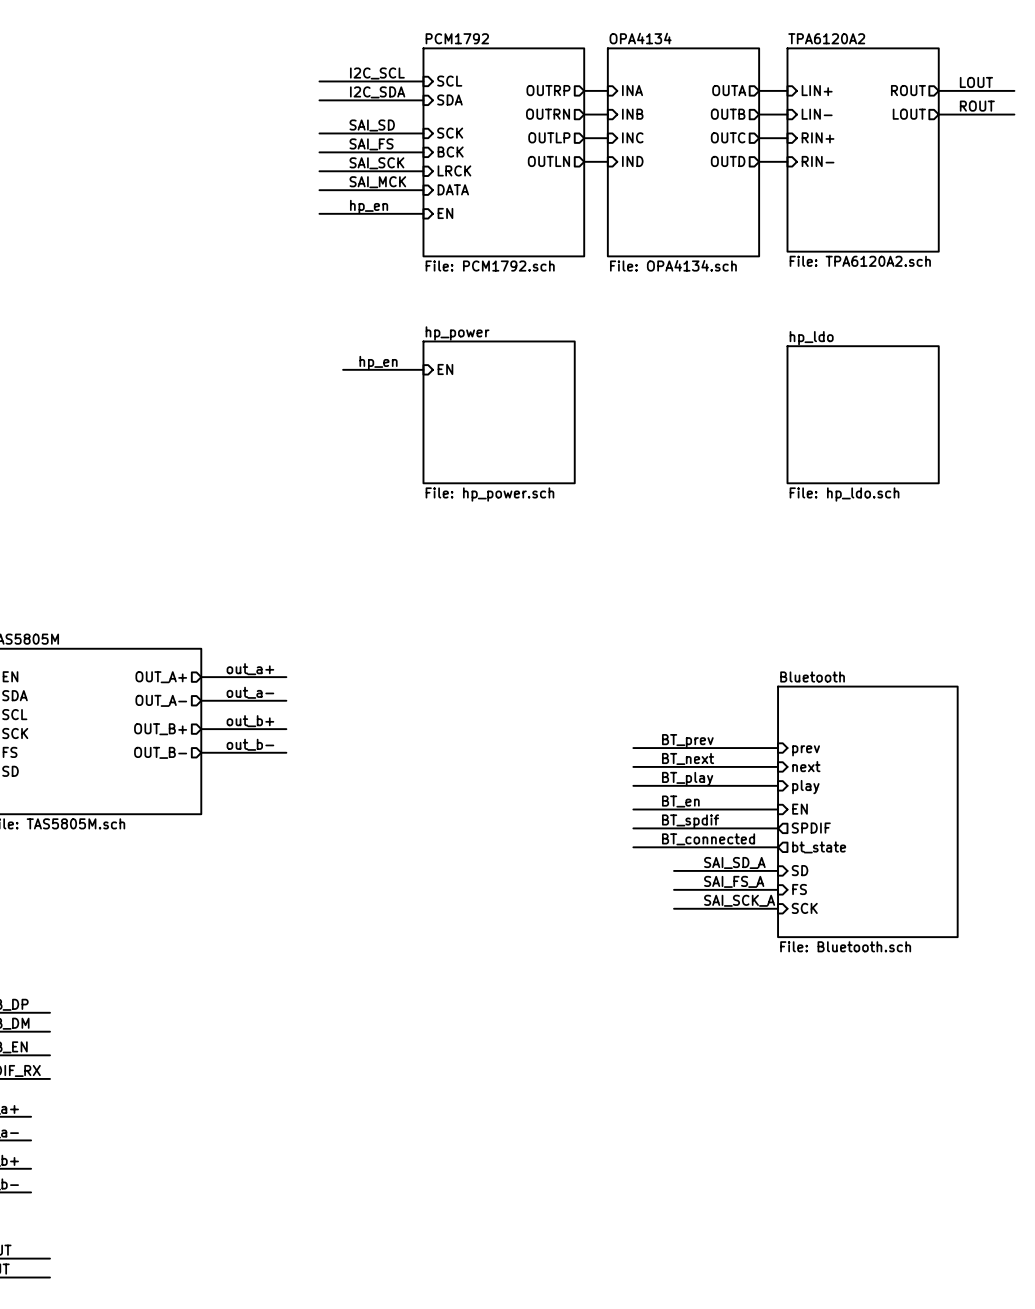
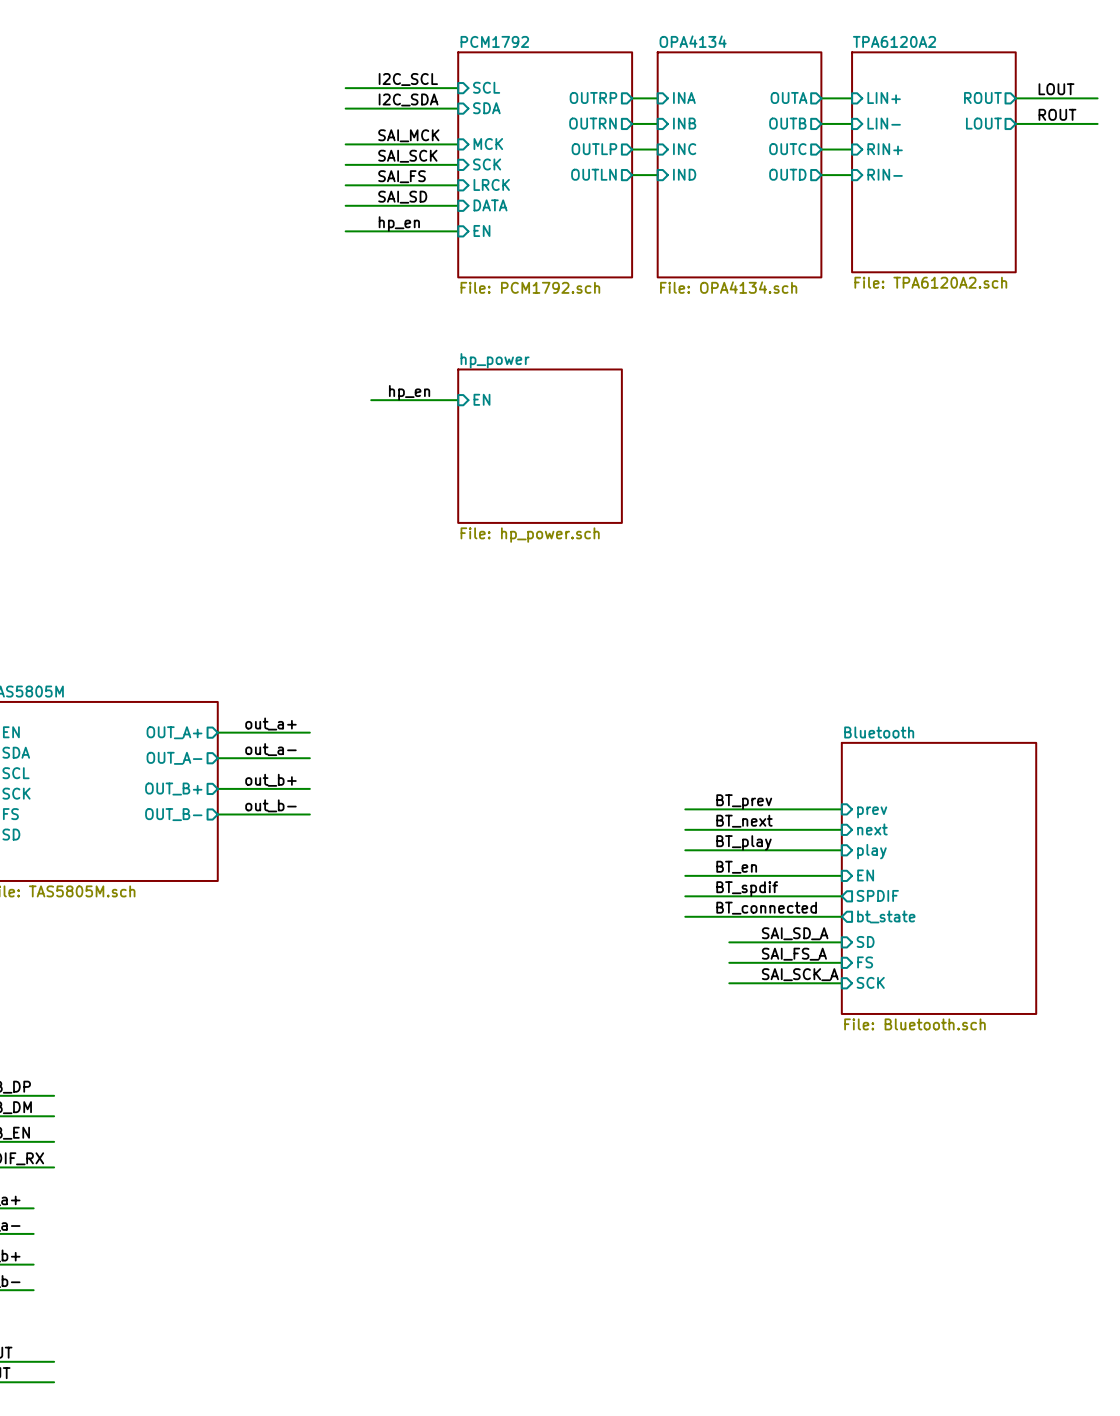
label: SAI_SD (372, 125) -> SAI_MCK (408, 135)
sheet pin: SCK (450, 133) -> MCK (488, 144)
label: SAI_FS (371, 144) -> SAI_SCK (407, 156)
sheet pin: BCK (450, 152) -> SCK (487, 164)
label: SAI_SCK (376, 163) -> SAI_FS (402, 176)
label: SAI_MCK (377, 182) -> SAI_SD (402, 197)
sheet hp_ldo: File: hp_ldo.sch (863, 414) -> none

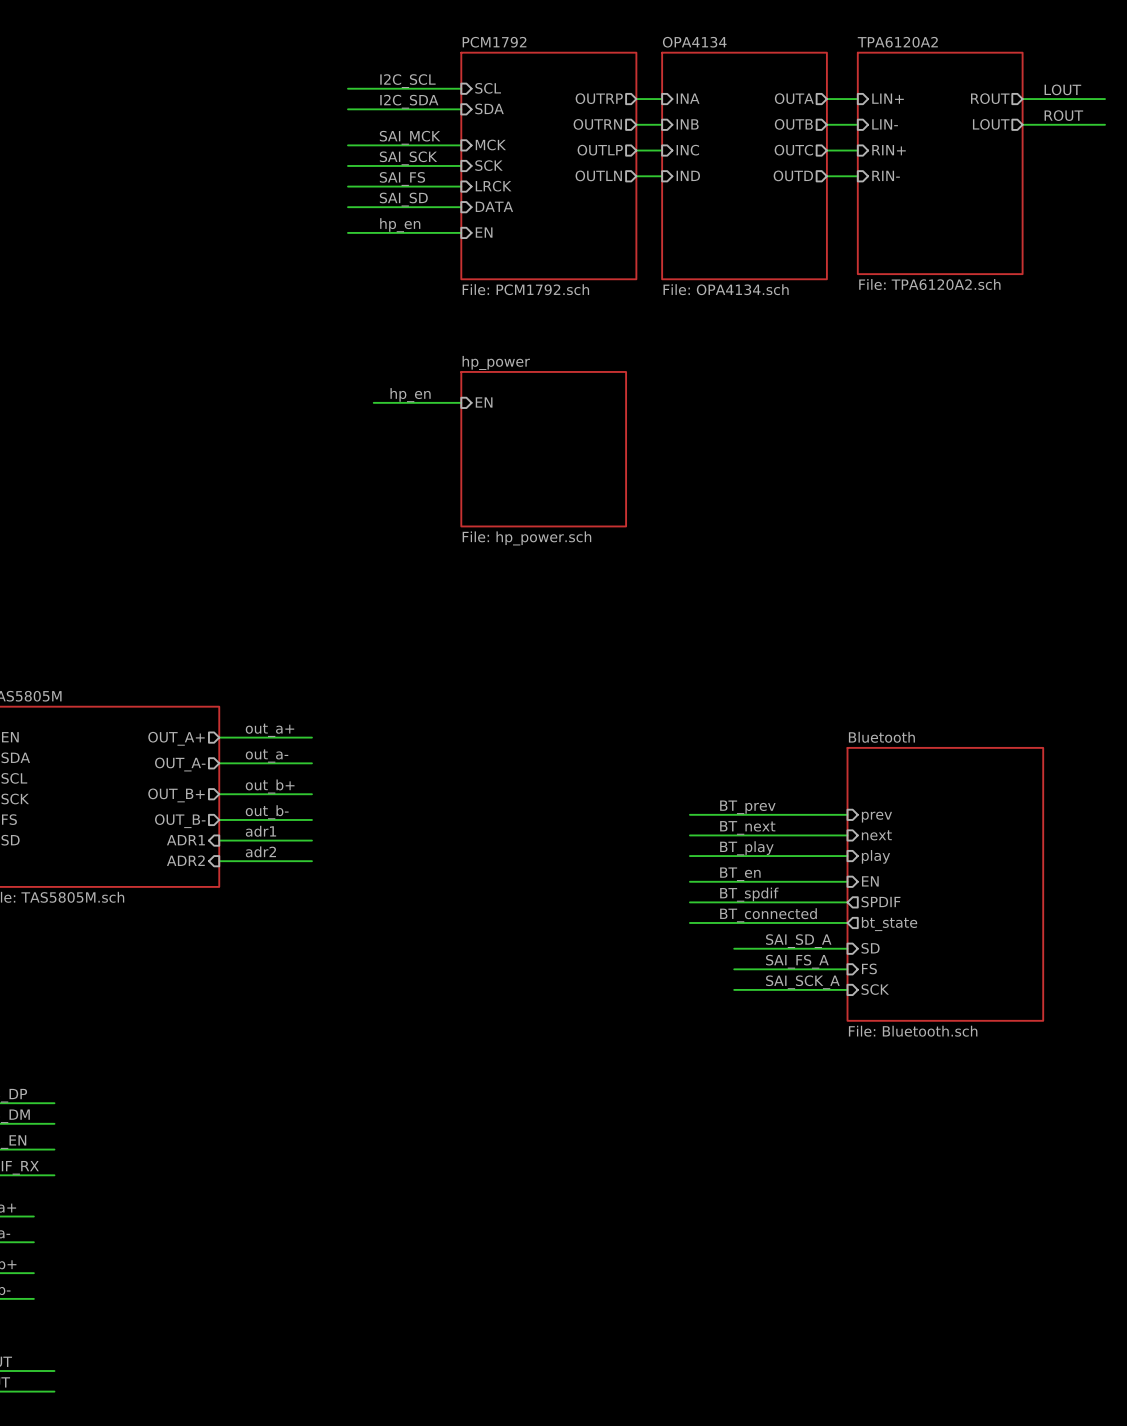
label: none -> adr1 (260, 831)
sheet pin: none -> ADR1 (185, 840)
wire: none -> (219, 840) (311, 840)
label: none -> adr2 (260, 851)
sheet pin: none -> ADR2 (185, 860)
wire: none -> (219, 861) (311, 861)

